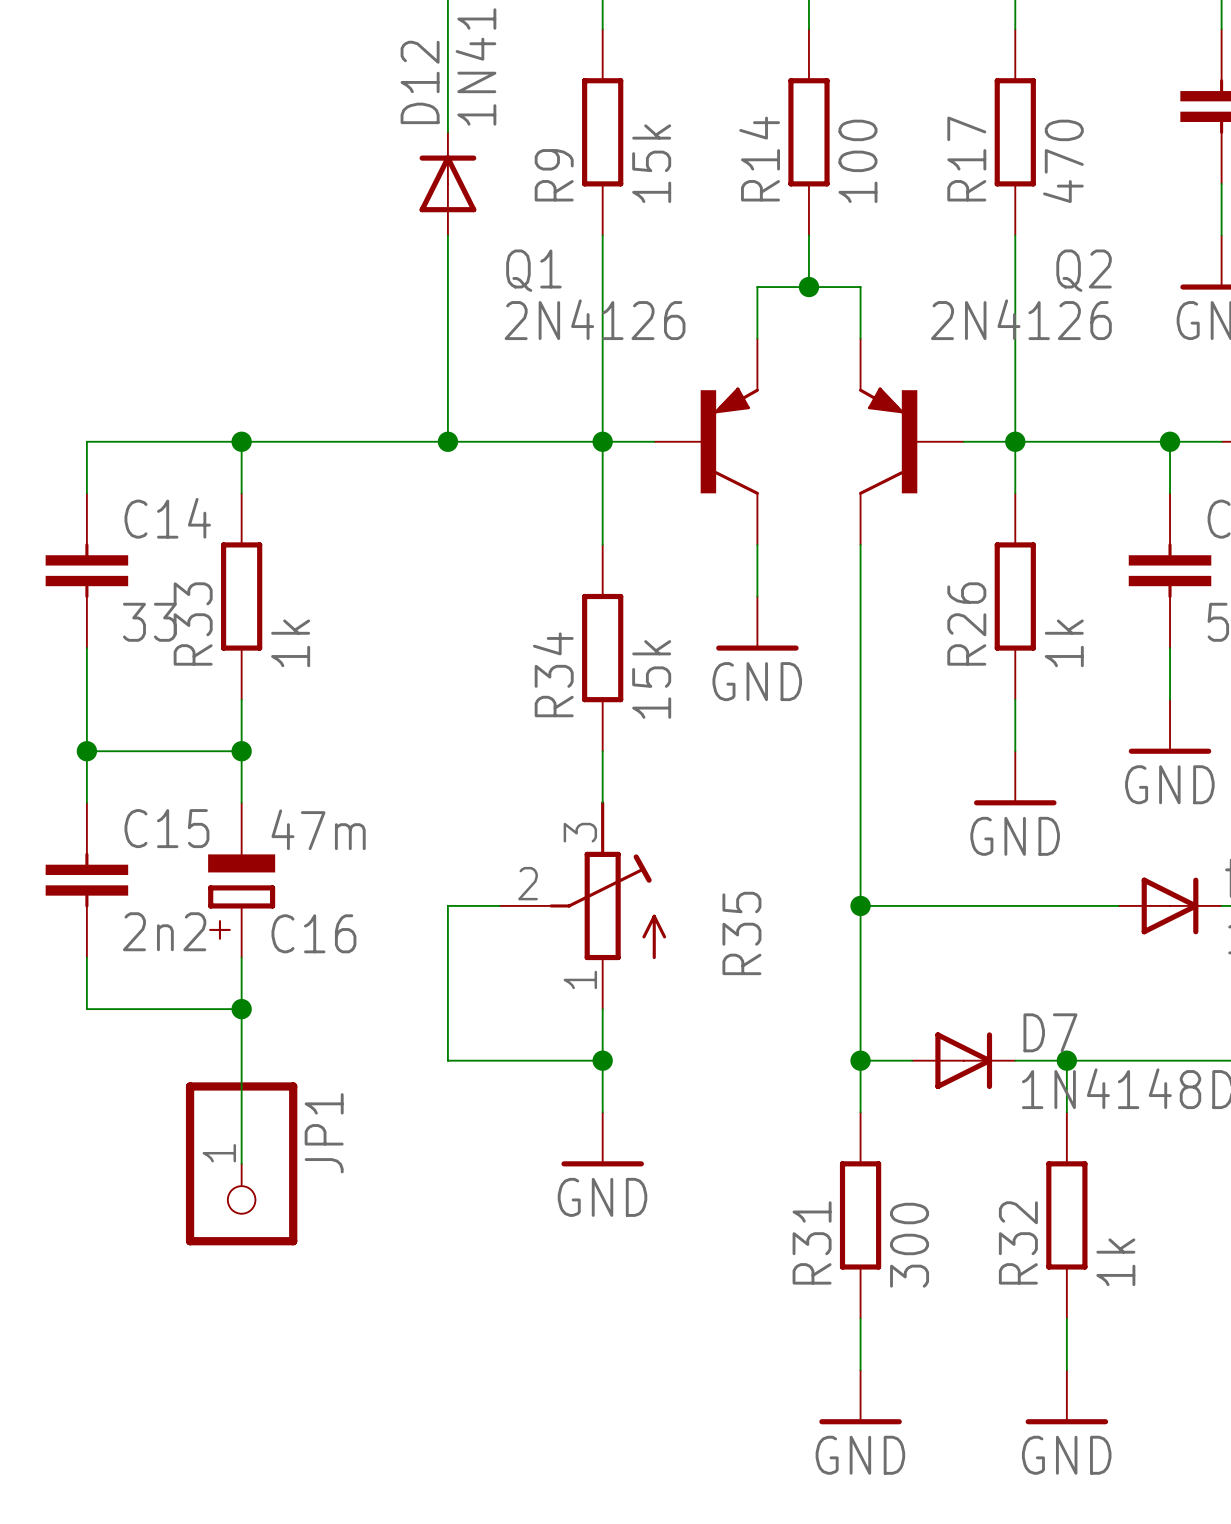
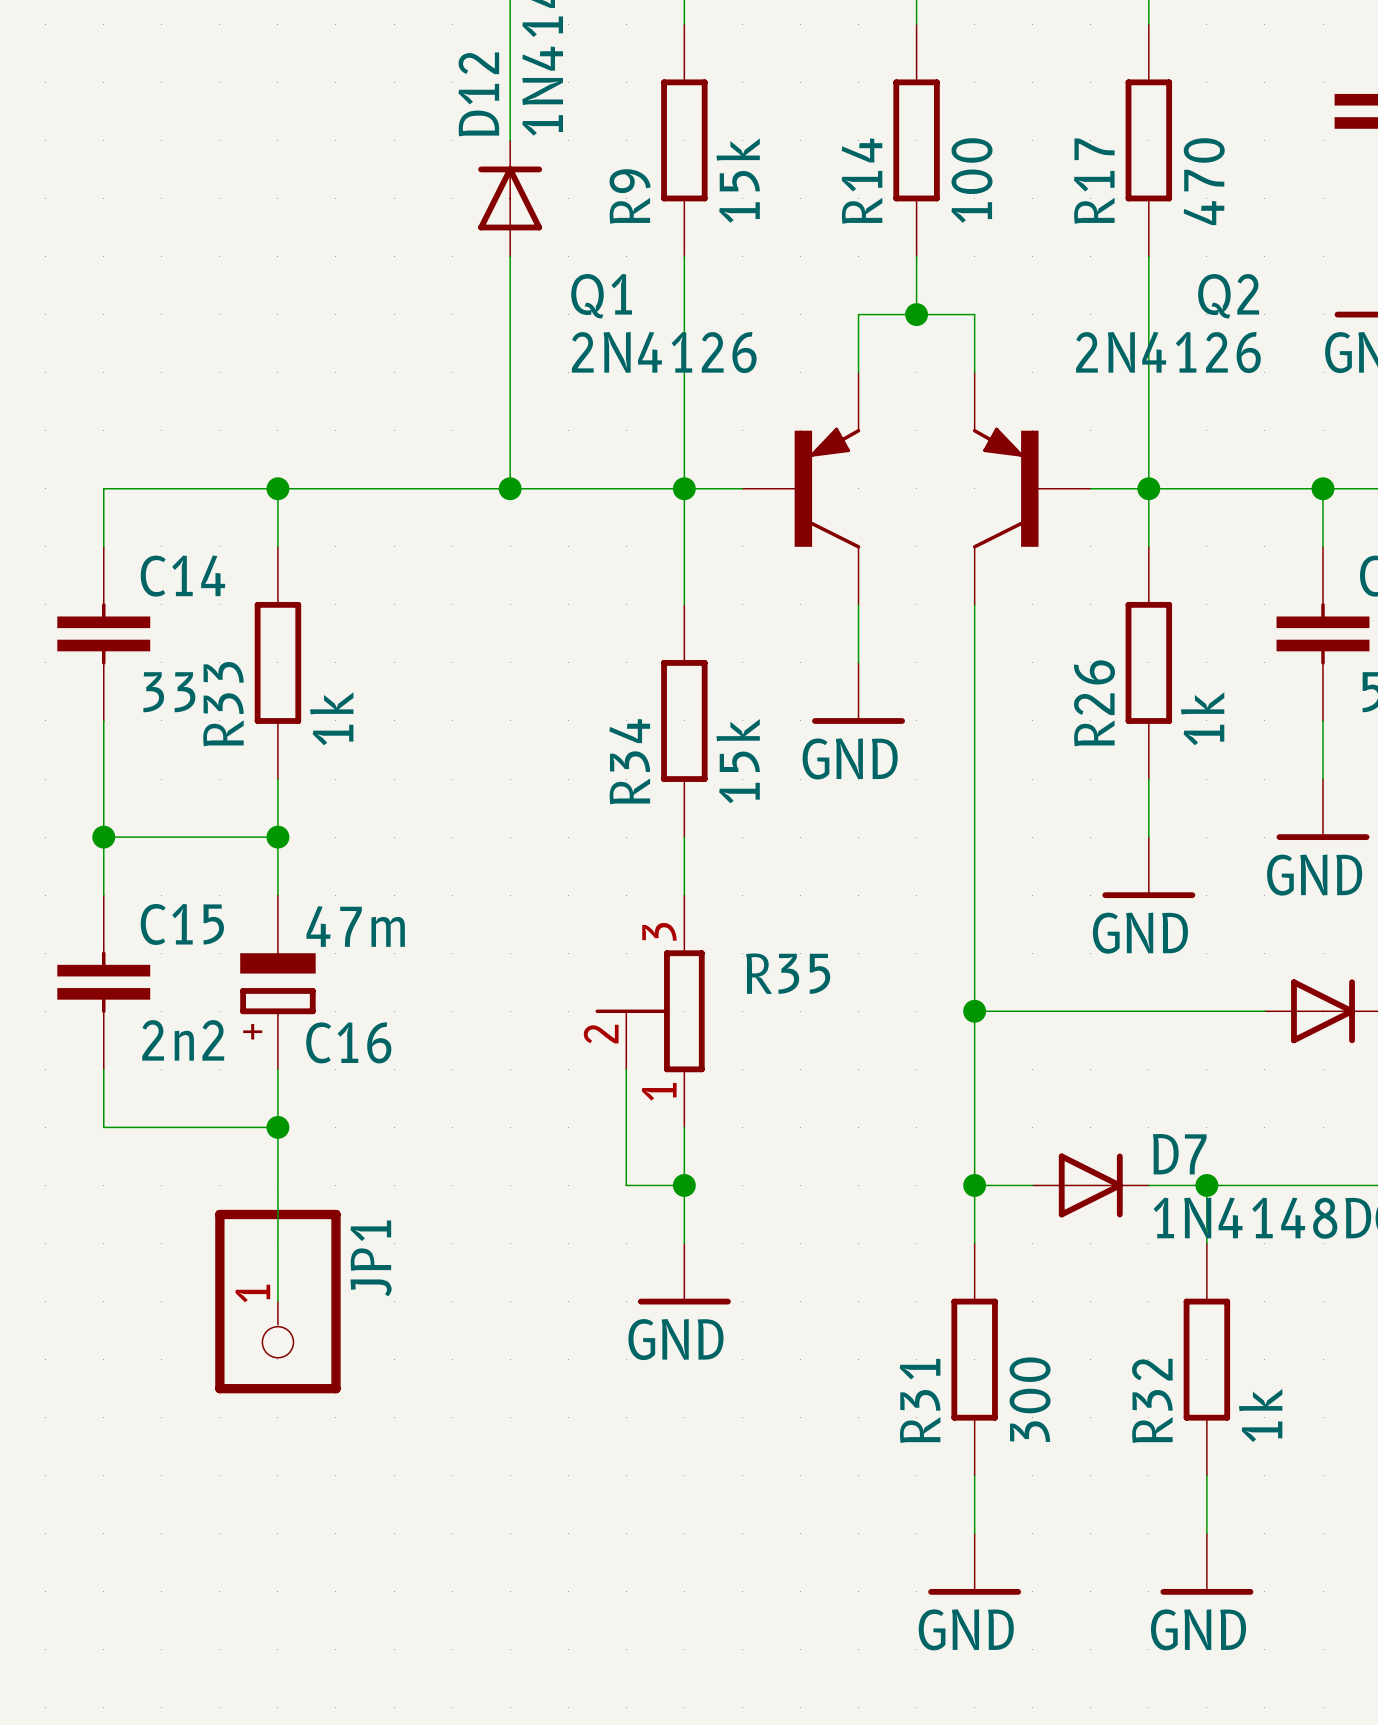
R35 symbol: [499, 801, 667, 1010] -> [595, 895, 705, 1128]
wire: (499, 905) (447, 905) (447, 1060) (551, 1060) -> (626, 1069) (626, 1185)
R35 name position: R35 (741, 933) -> R35 (788, 973)

